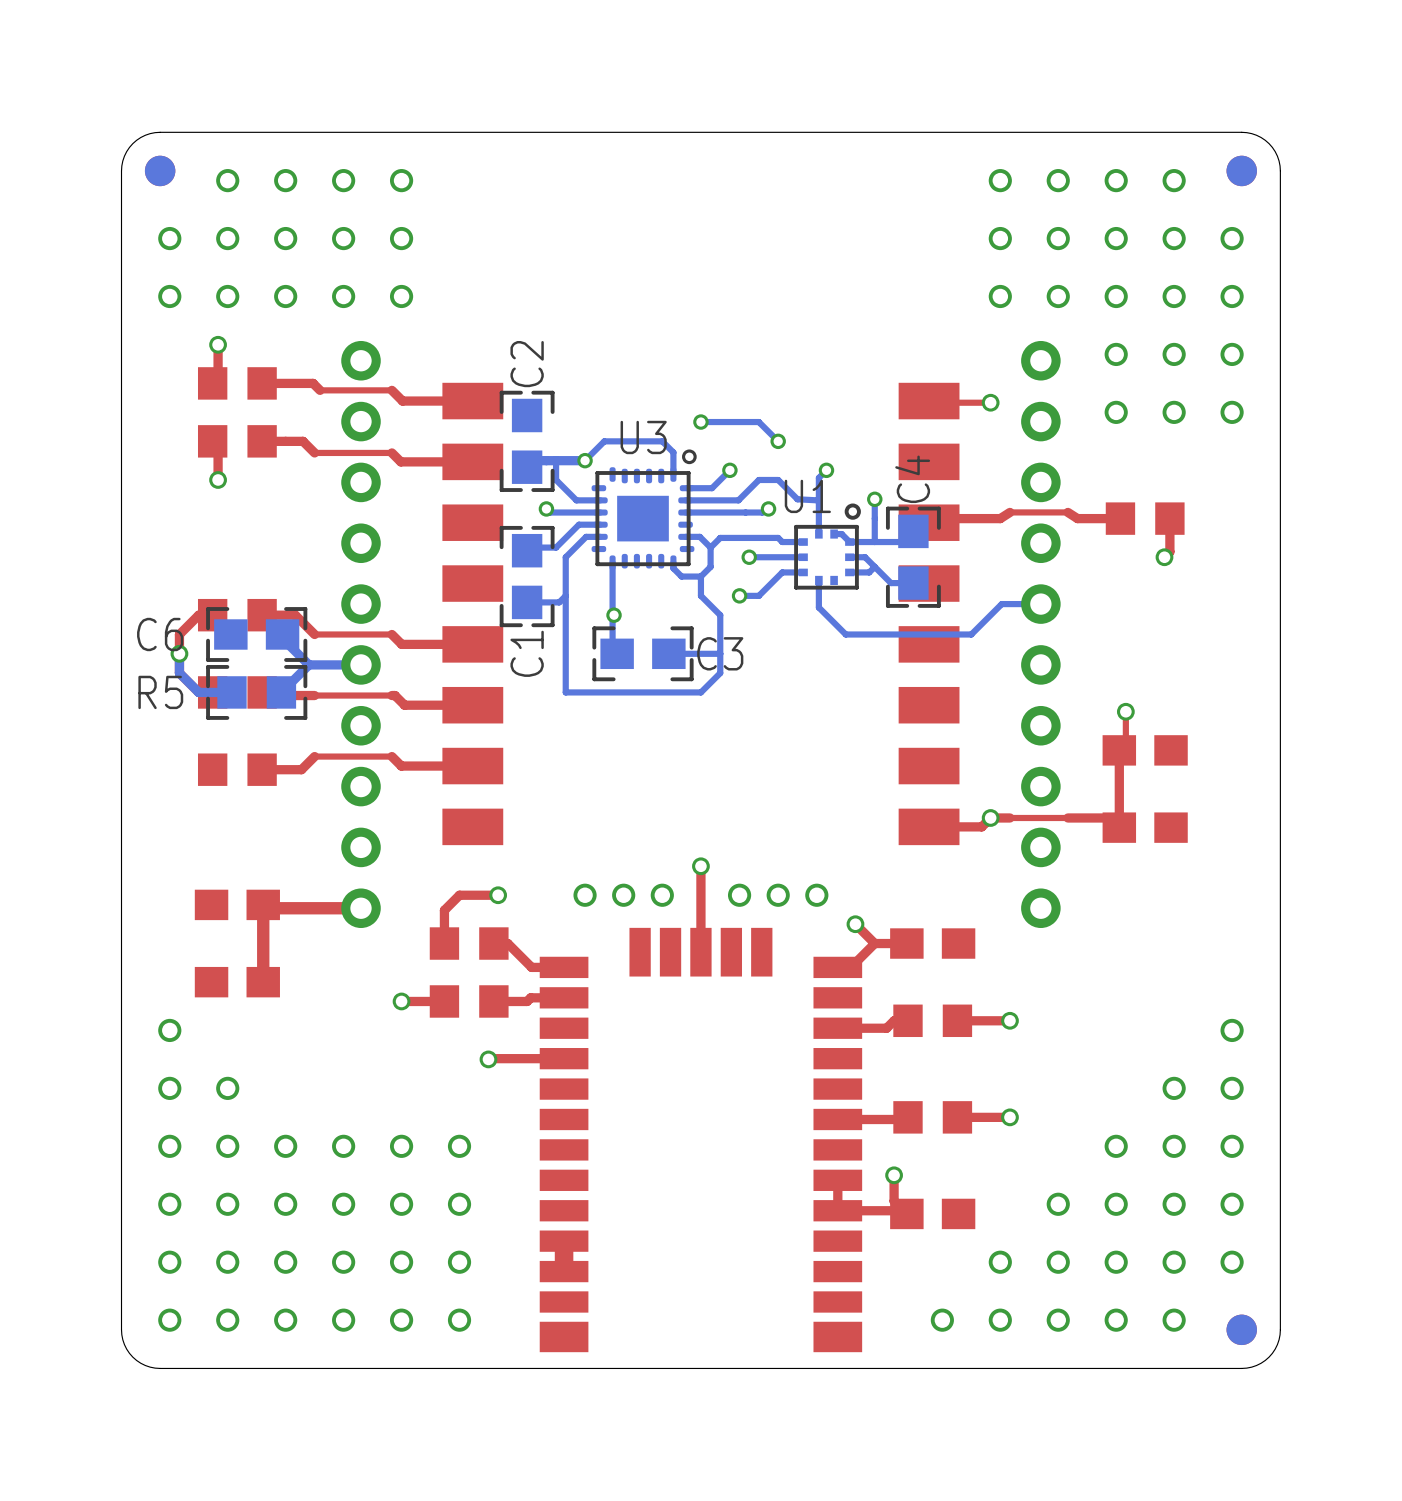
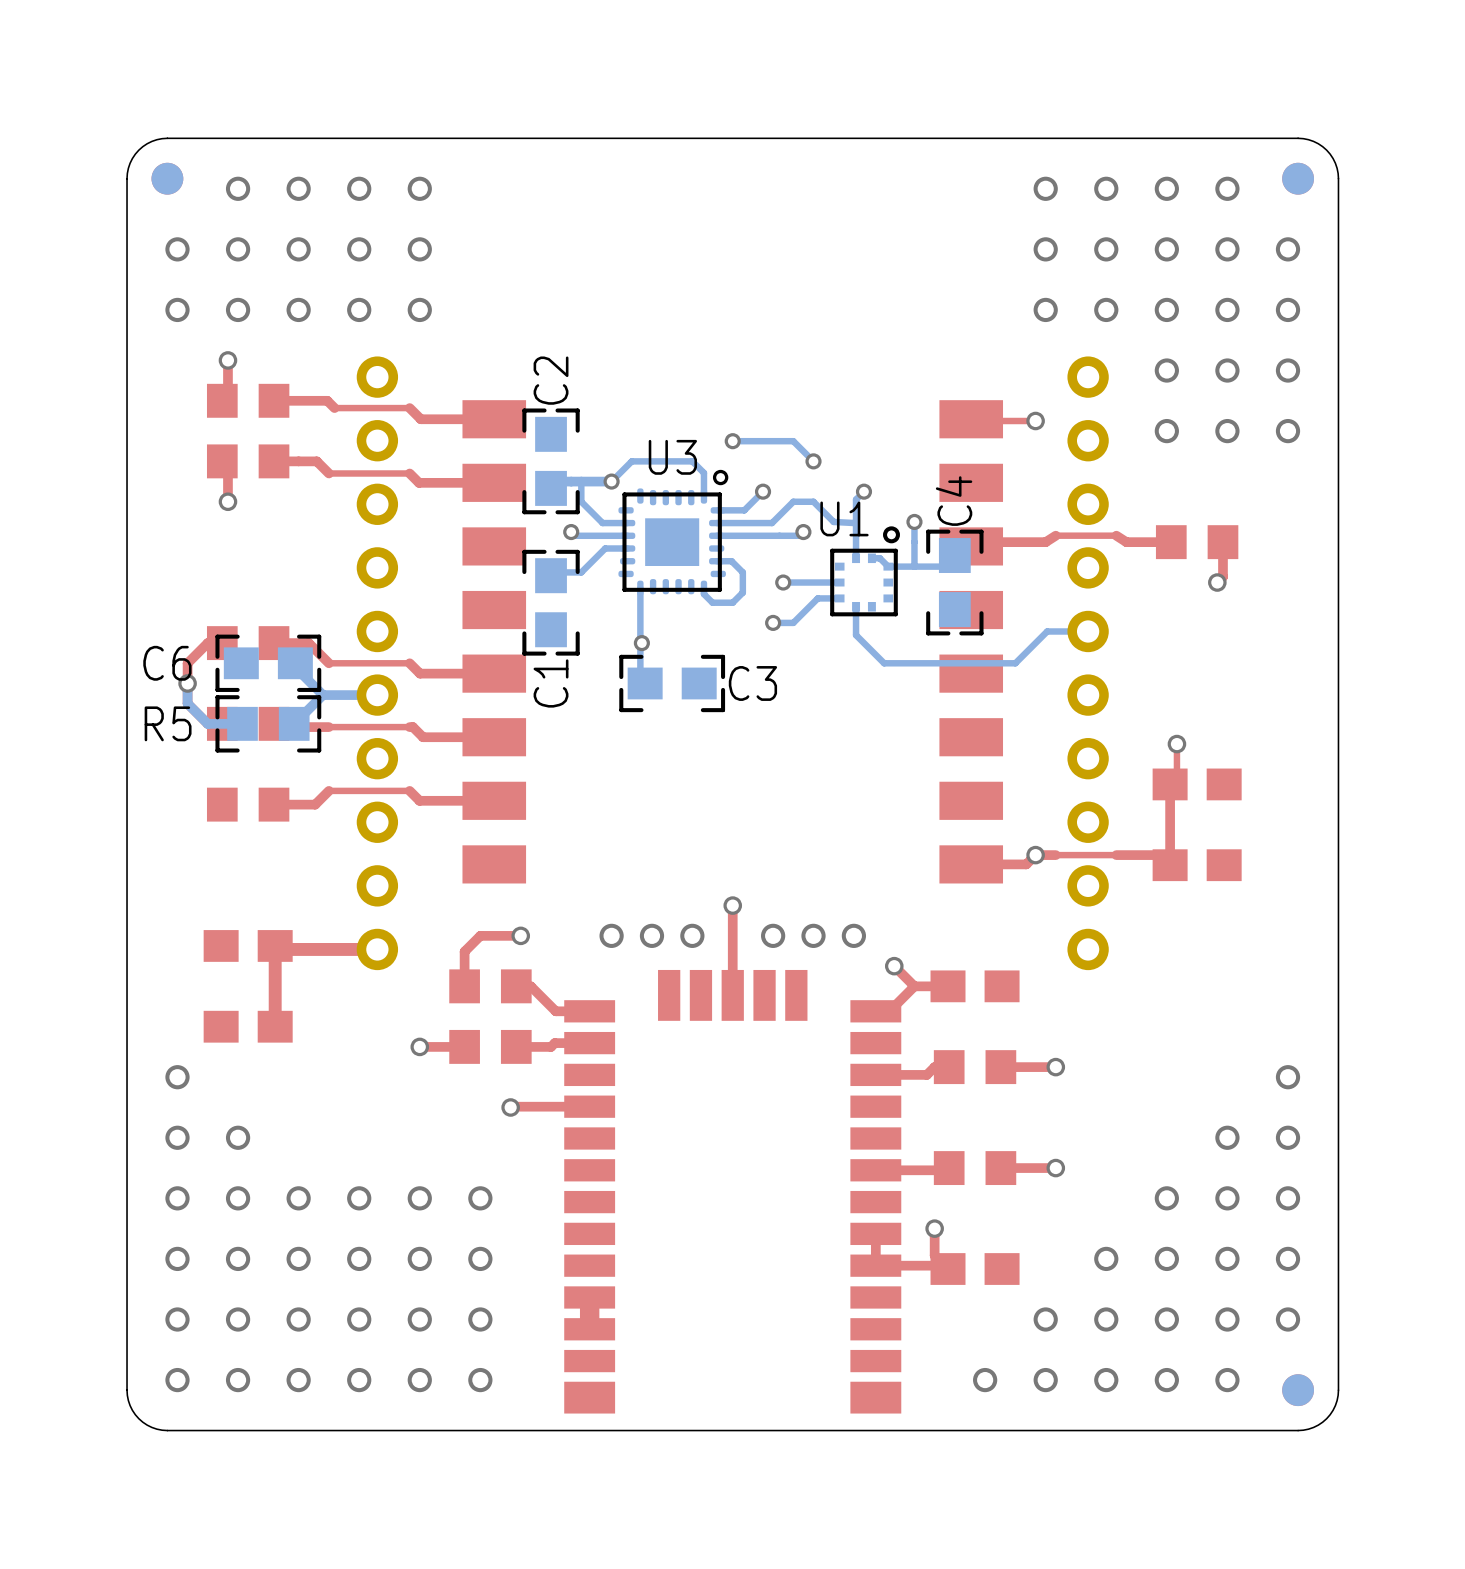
bottom track: (600, 536) (586, 536) (565, 557) (565, 692) (700, 692) (720, 673) (720, 615) (700, 595) (700, 576) -> none
bottom track: (803, 542) (782, 542) (778, 537) (720, 537) (710, 547) -> none
bottom track: (849, 557) (865, 557) (890, 583) (913, 583) -> none
bottom track: (874, 566) (869, 572) (849, 572) -> none
bottom track: (565, 595) (559, 602) (527, 602) -> none
bottom track: (720, 653) (668, 653) -> none

